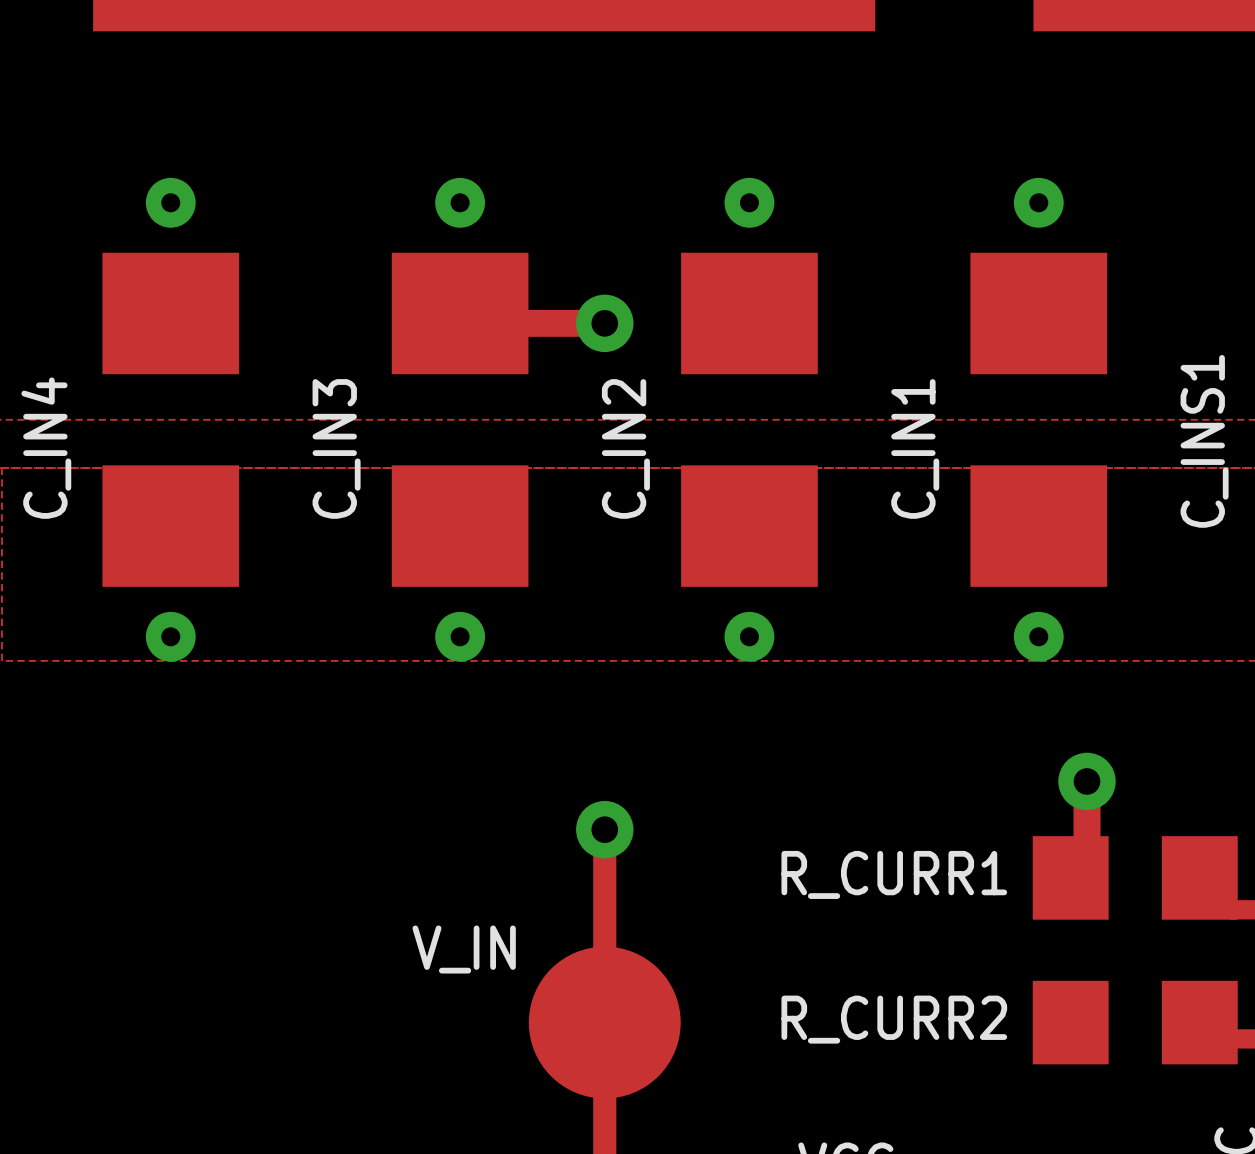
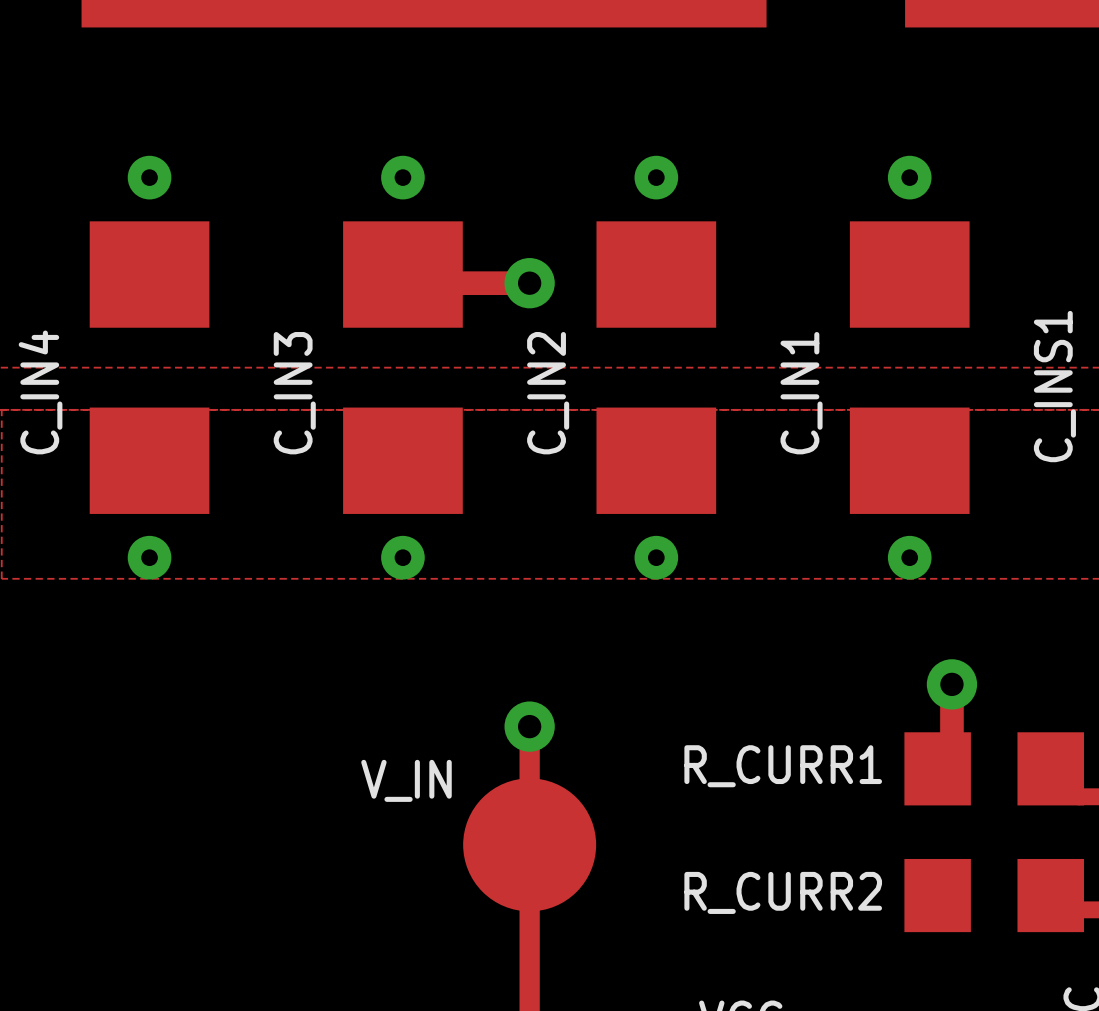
V_IN position: (604, 1022) -> (529, 844)

